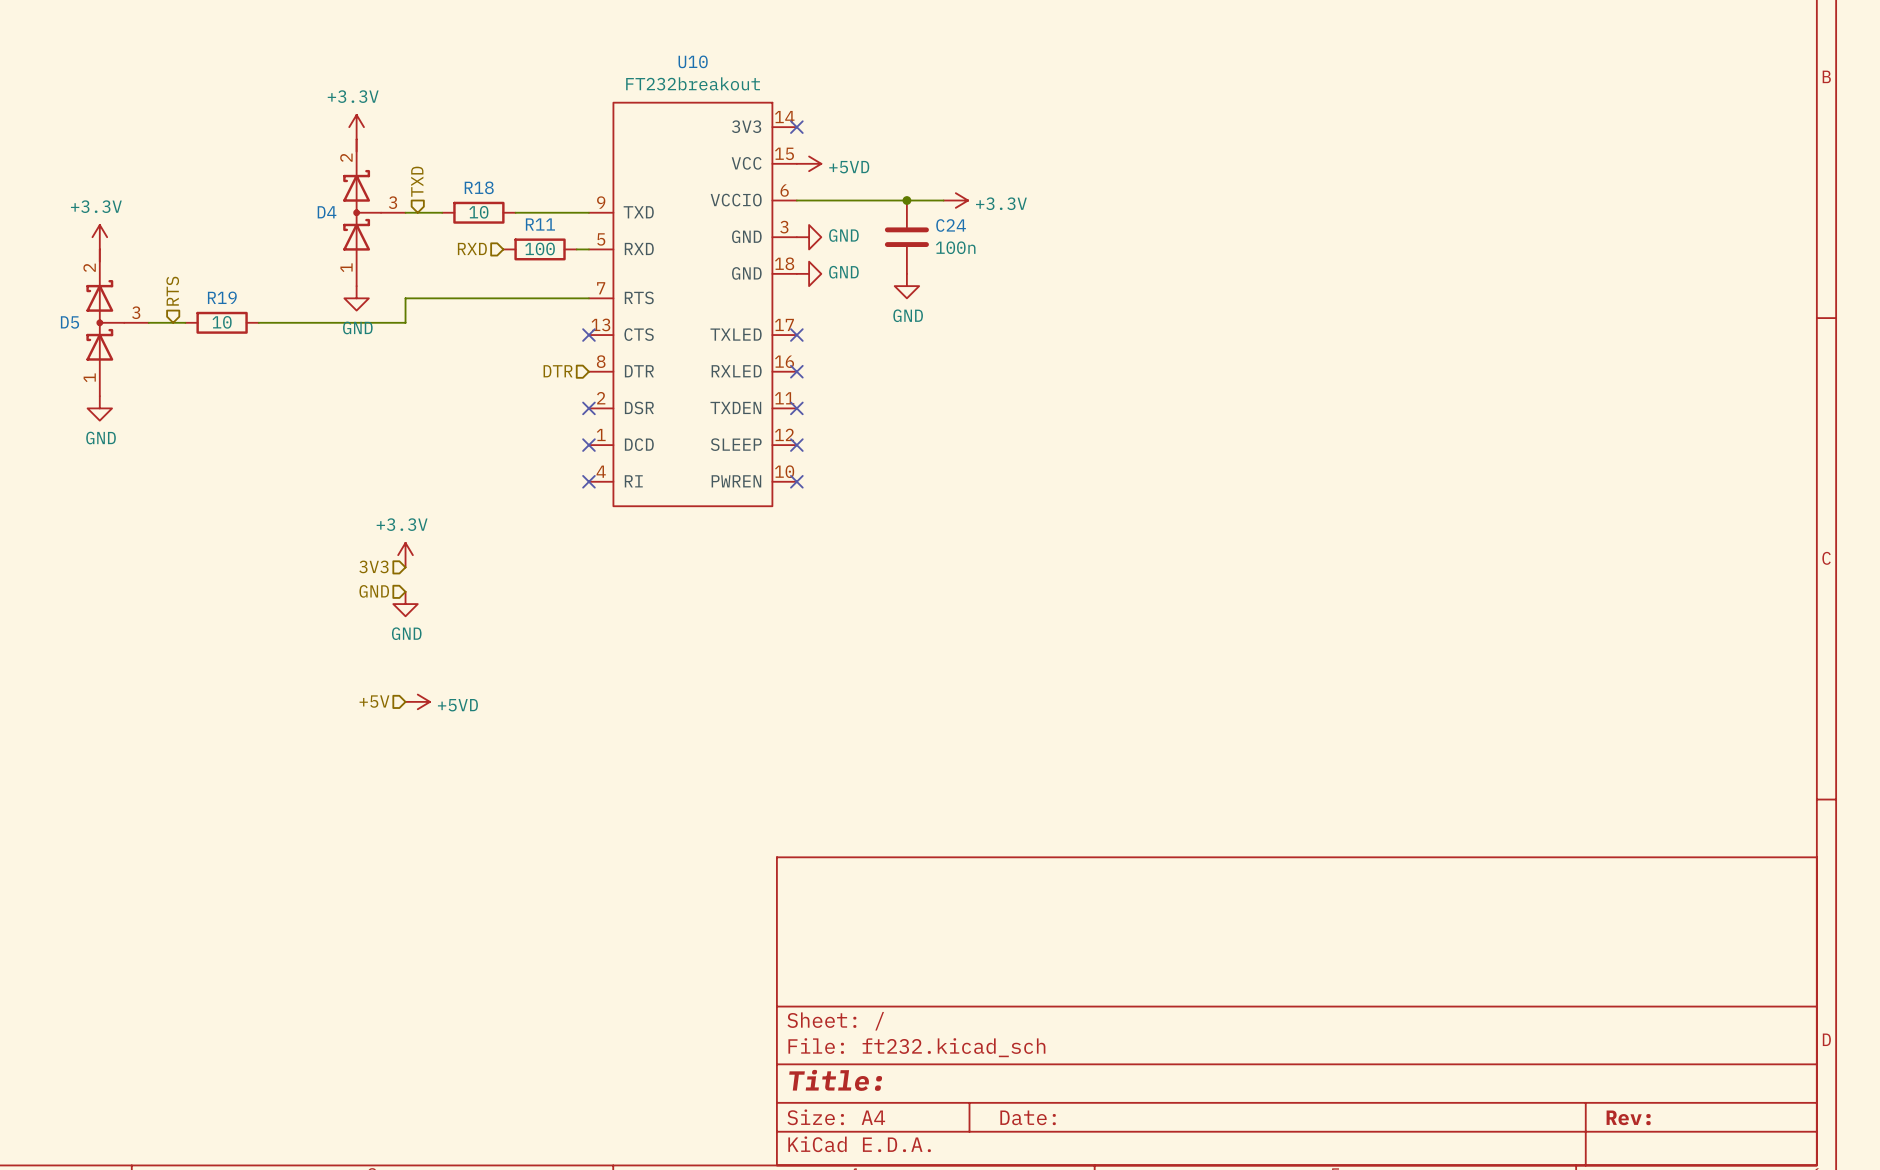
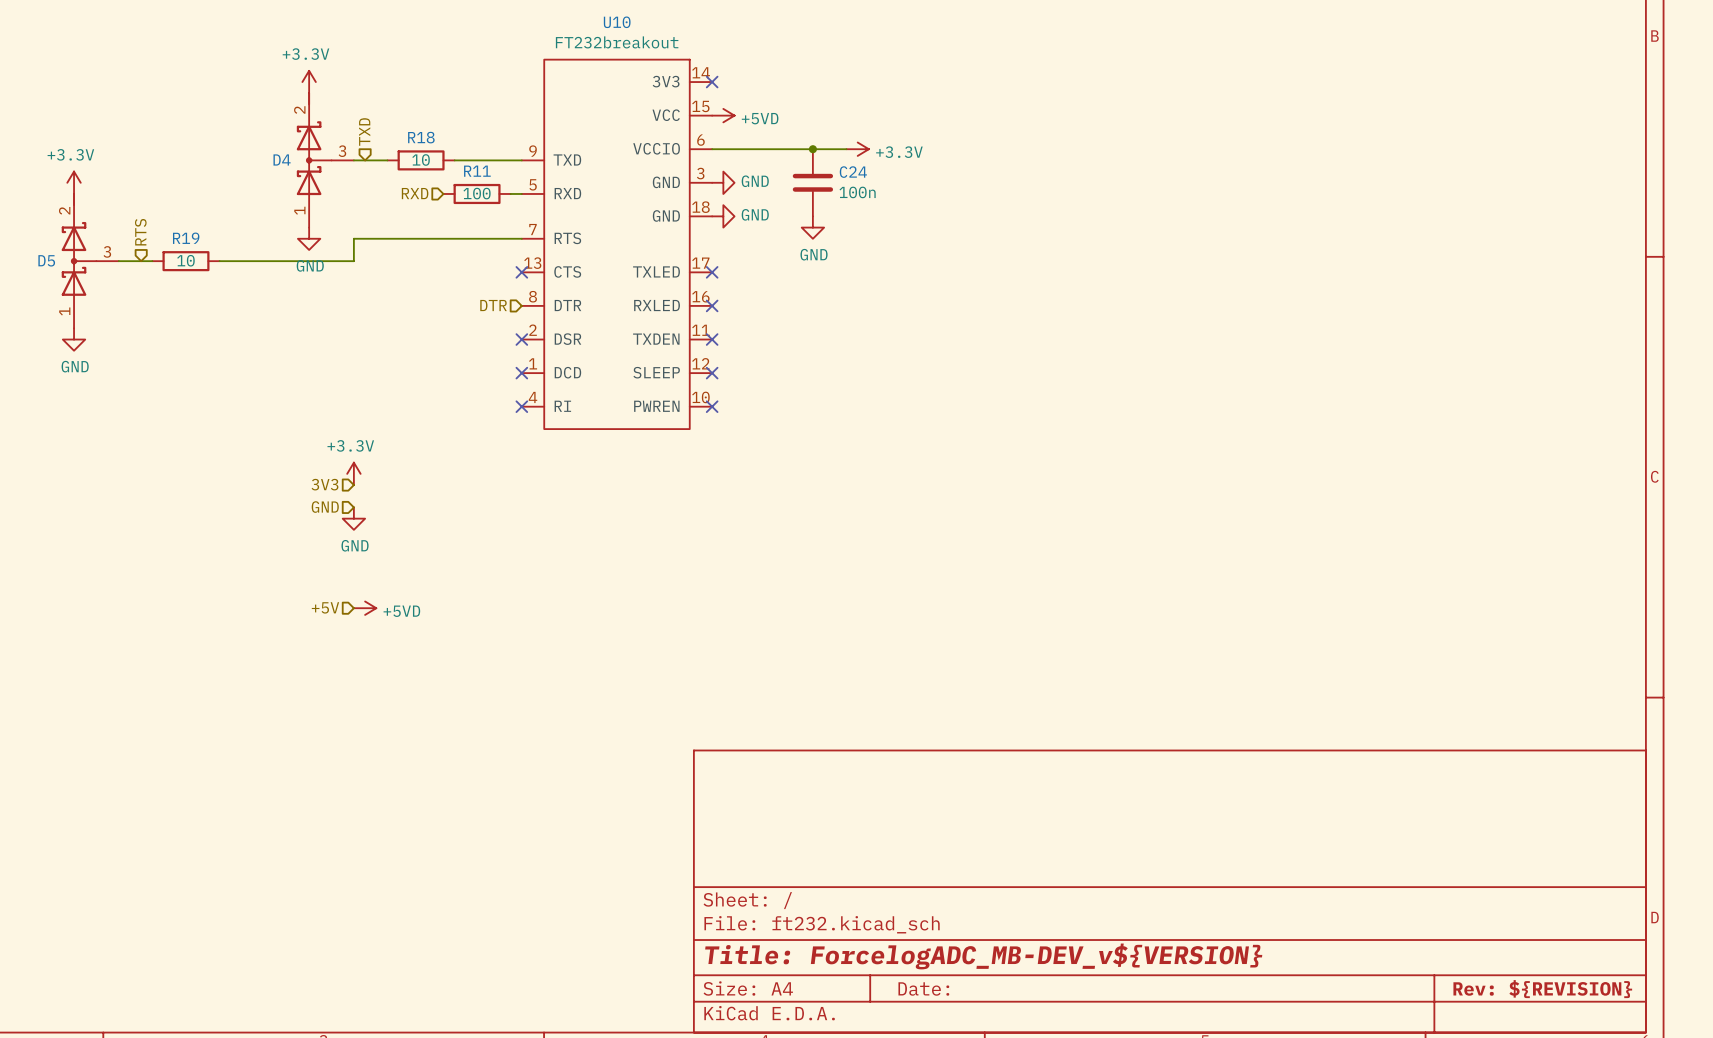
title block: Title: (835, 1080) -> Title: ForcelogADC_MB-DEV_v${VERSION} (983, 956)
title block: Rev: (1628, 1117) -> Rev: ${REVISION} (1542, 989)

